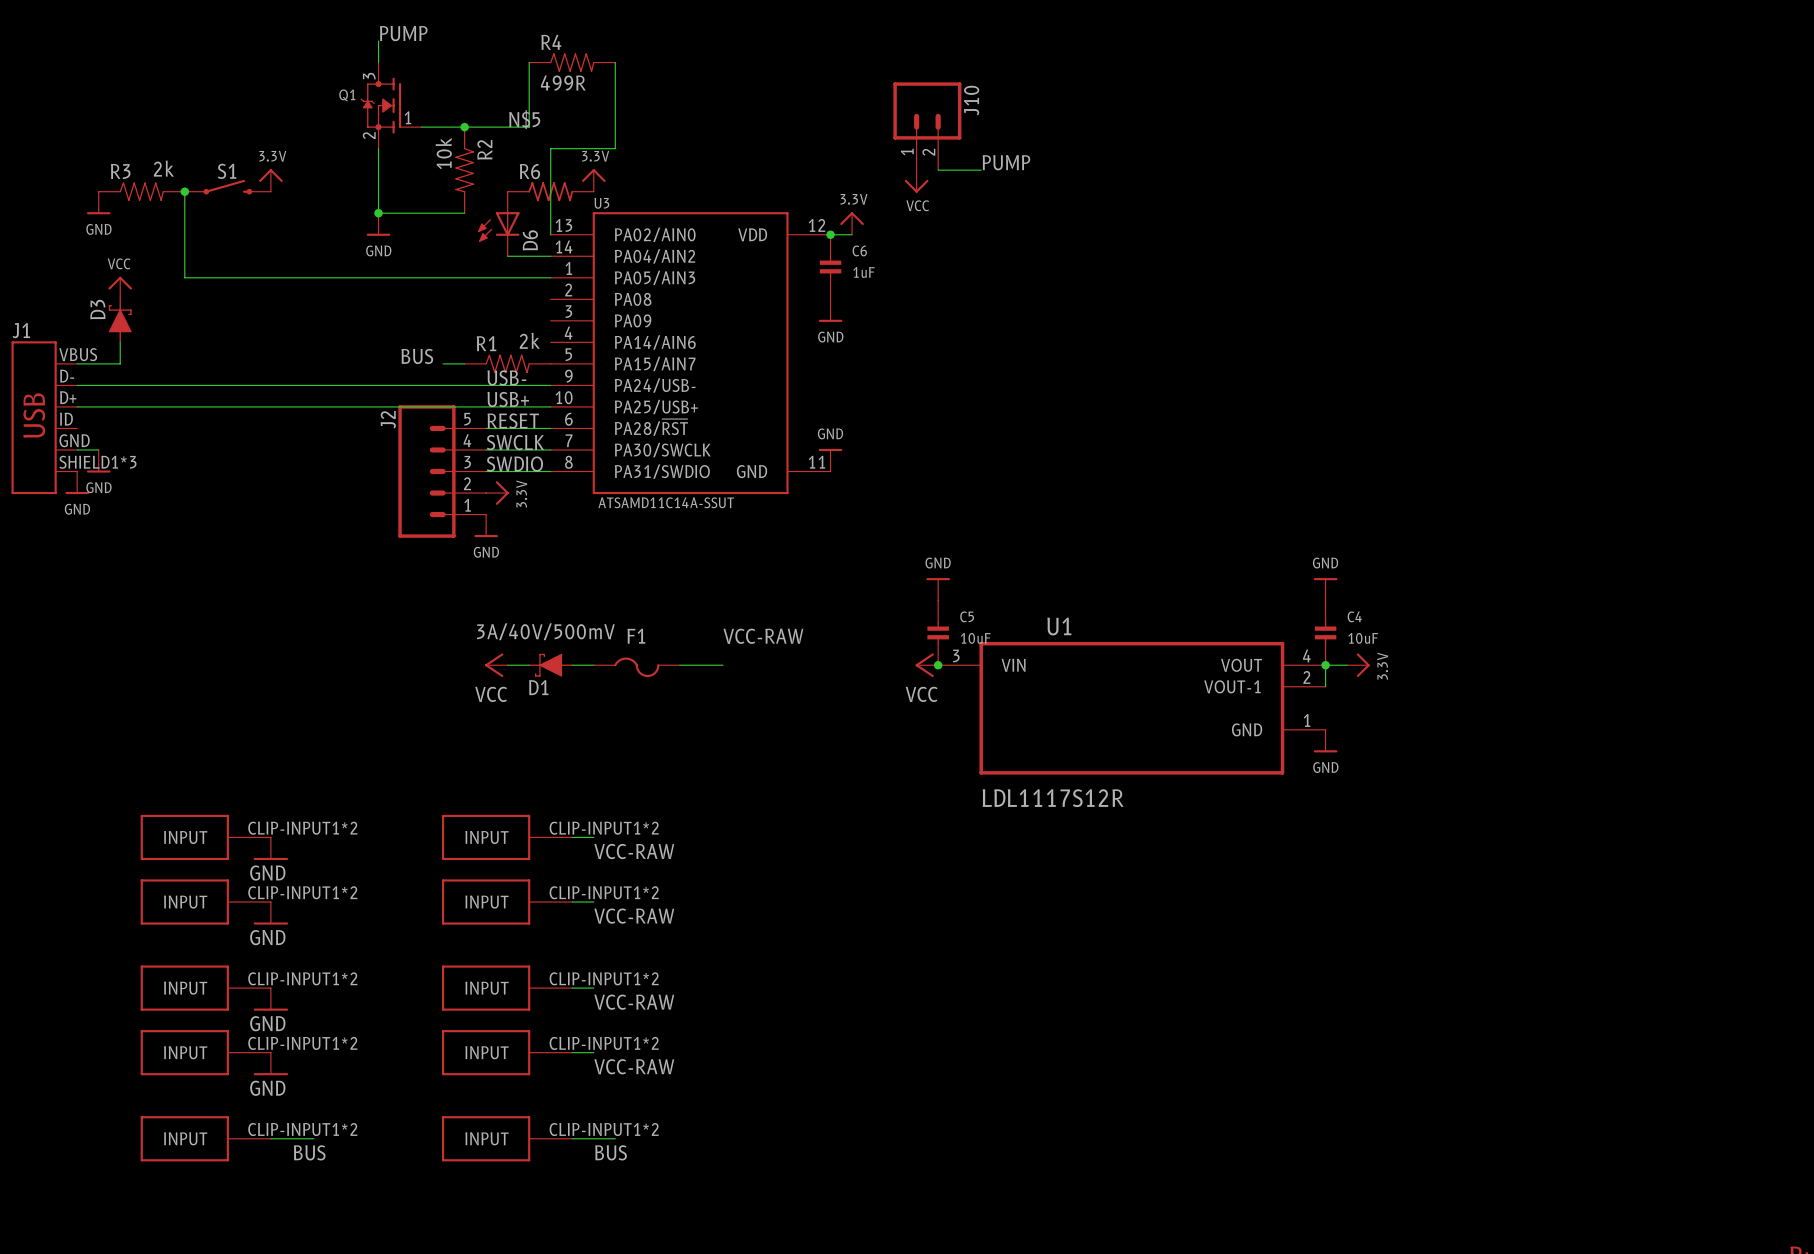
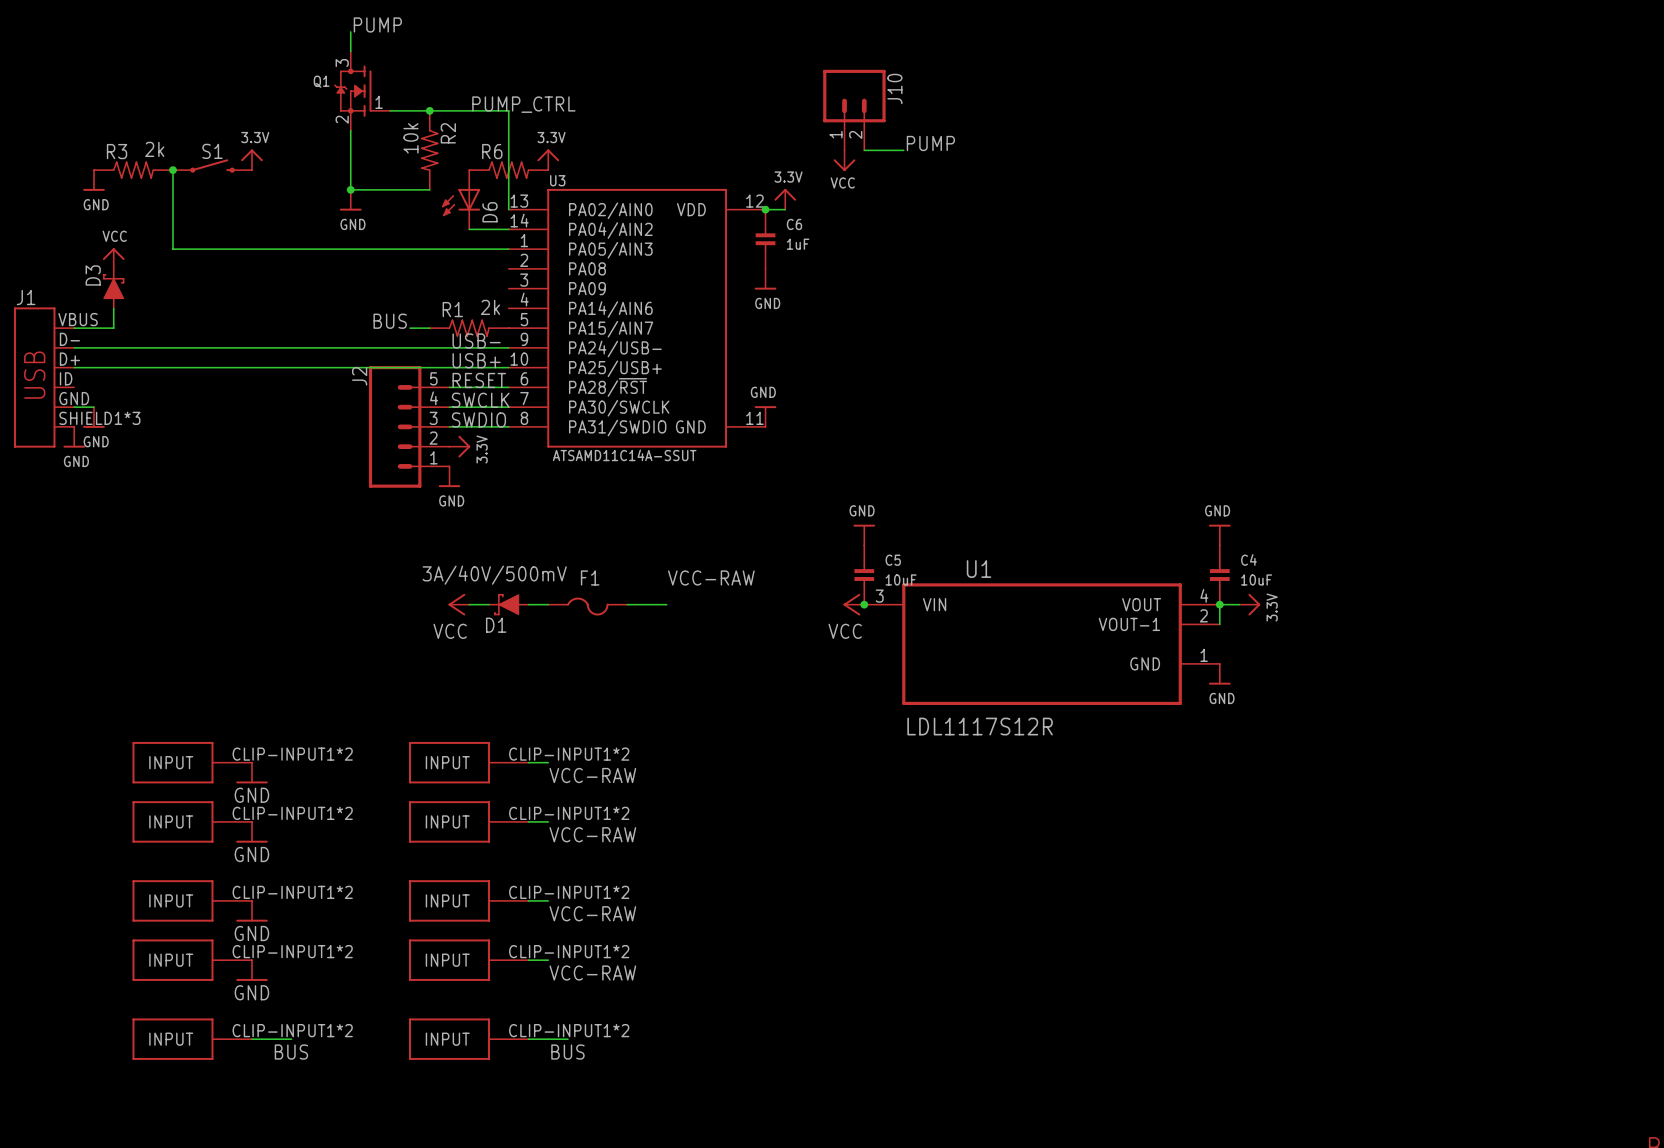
wire: (529, 62) (529, 127) -> (508, 130) (508, 110) (489, 110)
R4: 499R (572, 62) -> none
wire: (615, 62) (615, 148) (550, 148) -> none
label: N$5 (524, 119) -> PUMP_CTRL (523, 104)

